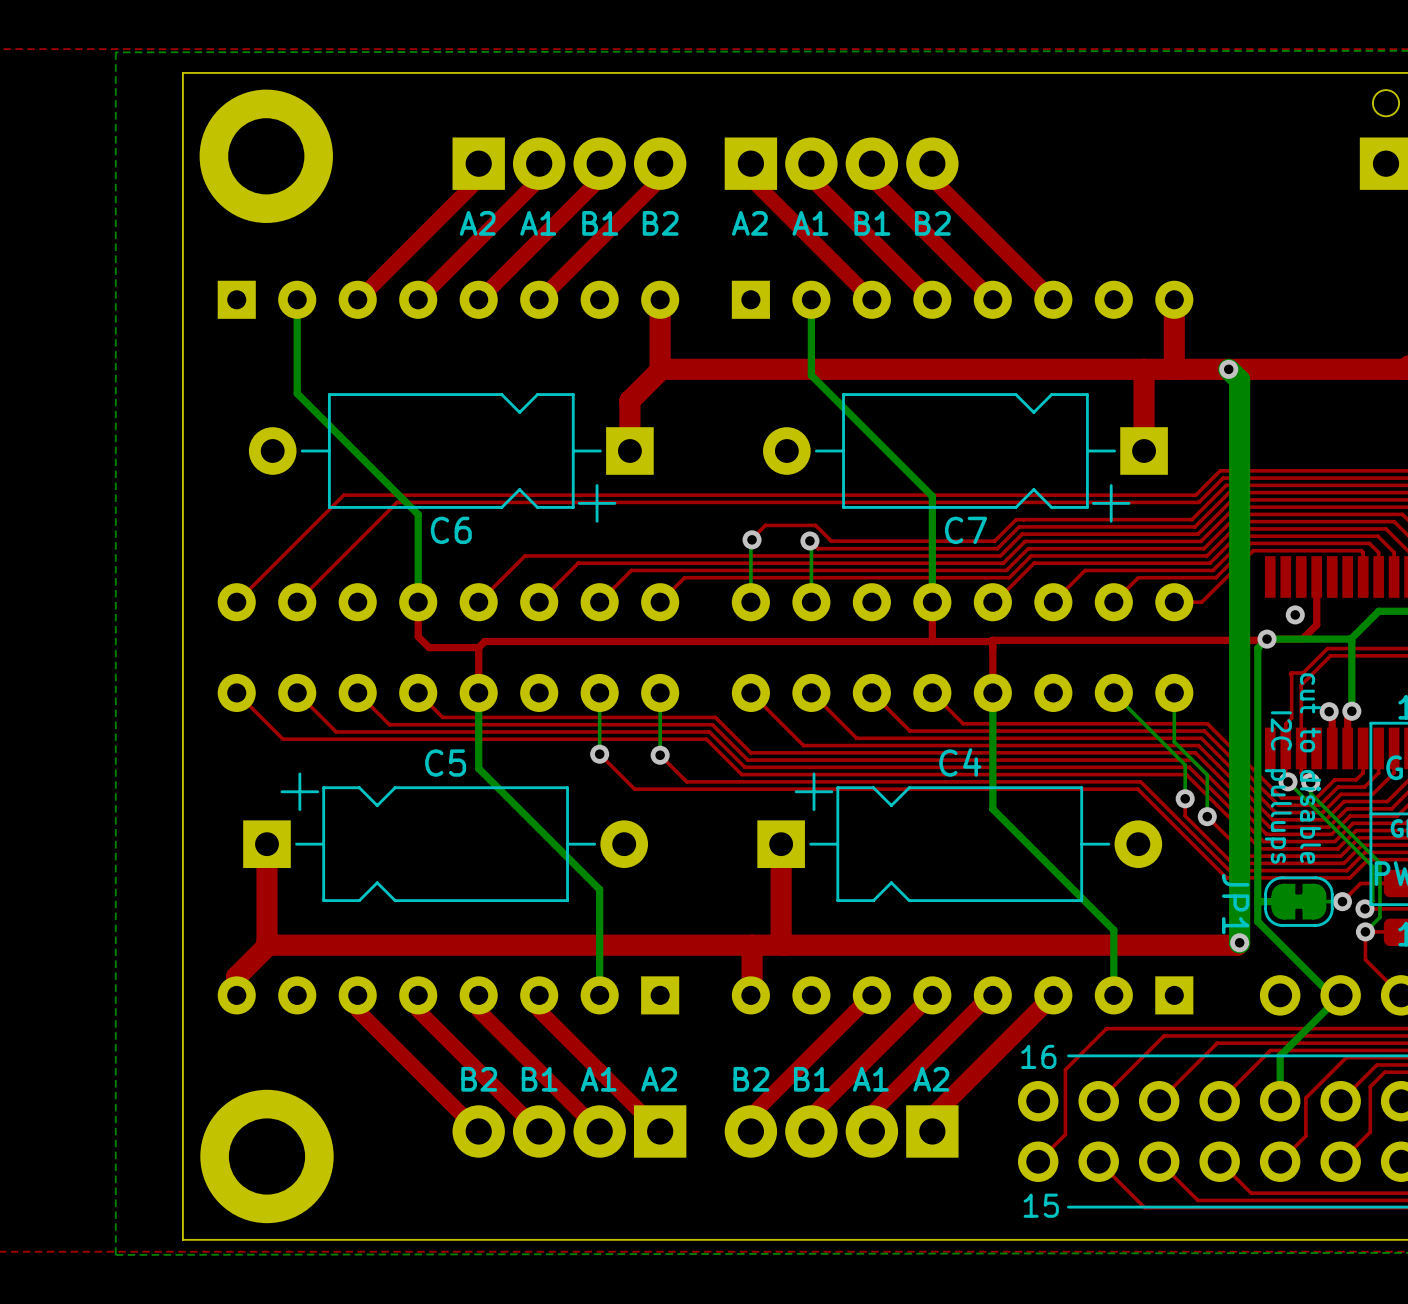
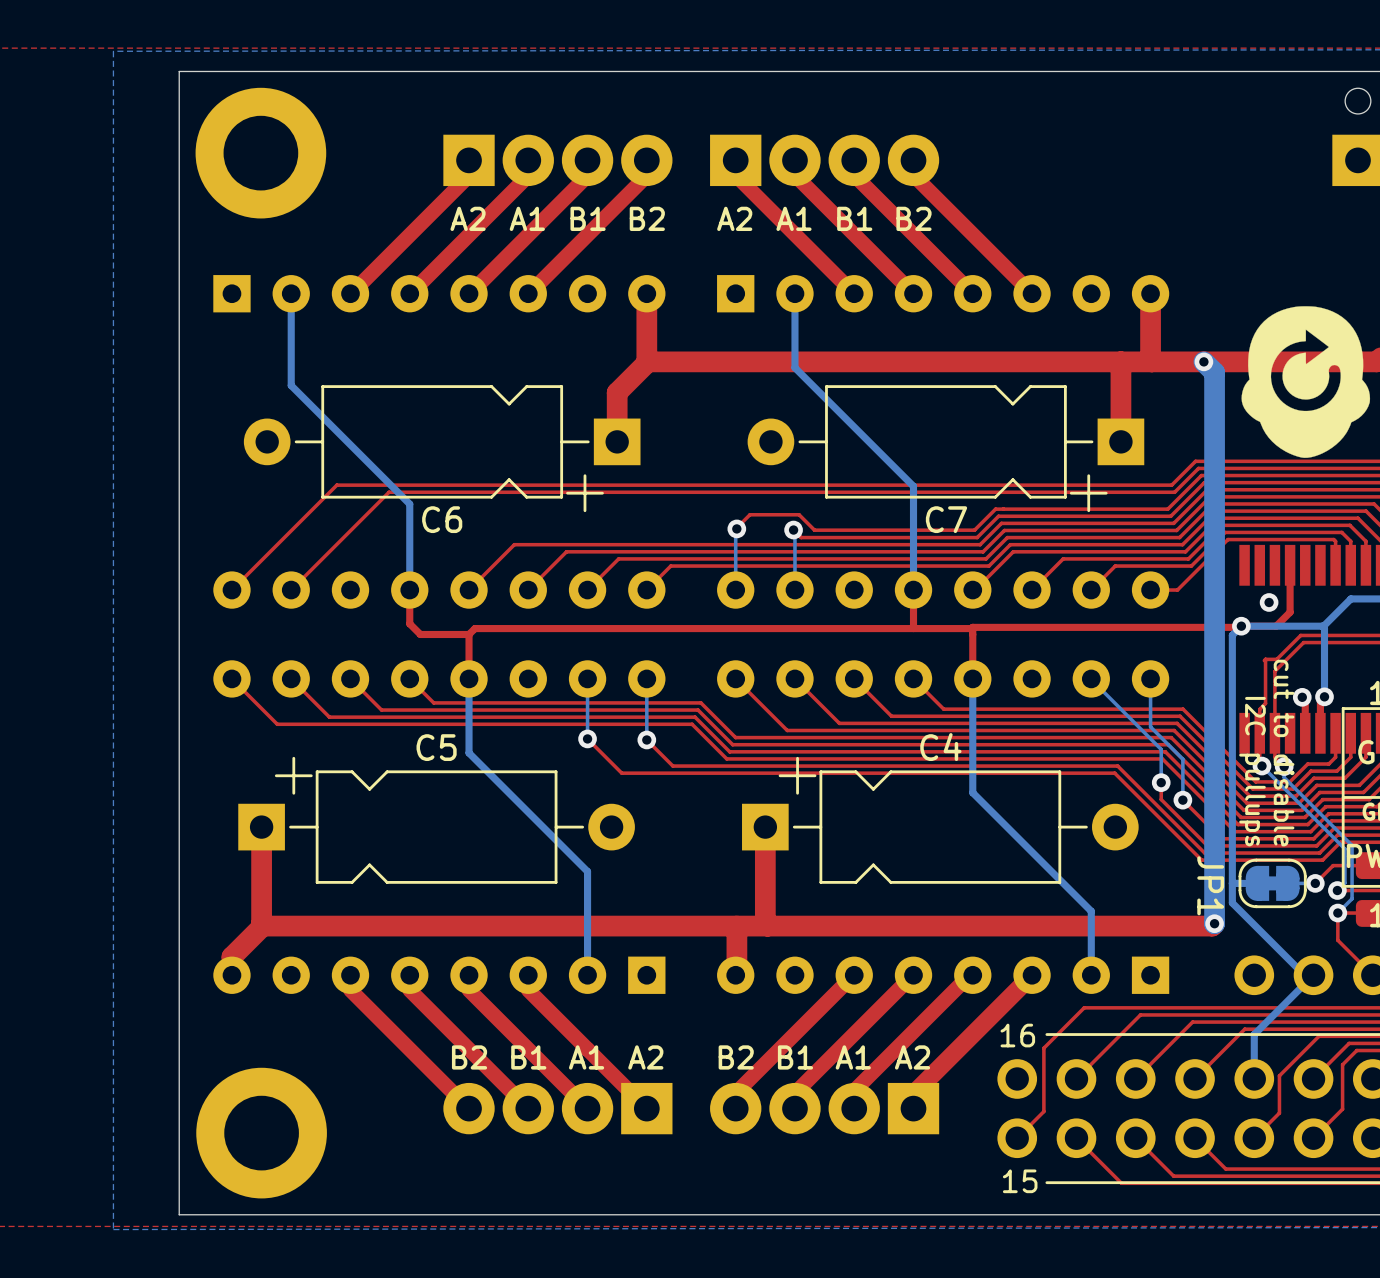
drawing: none -> [1241, 306, 1371, 458]

